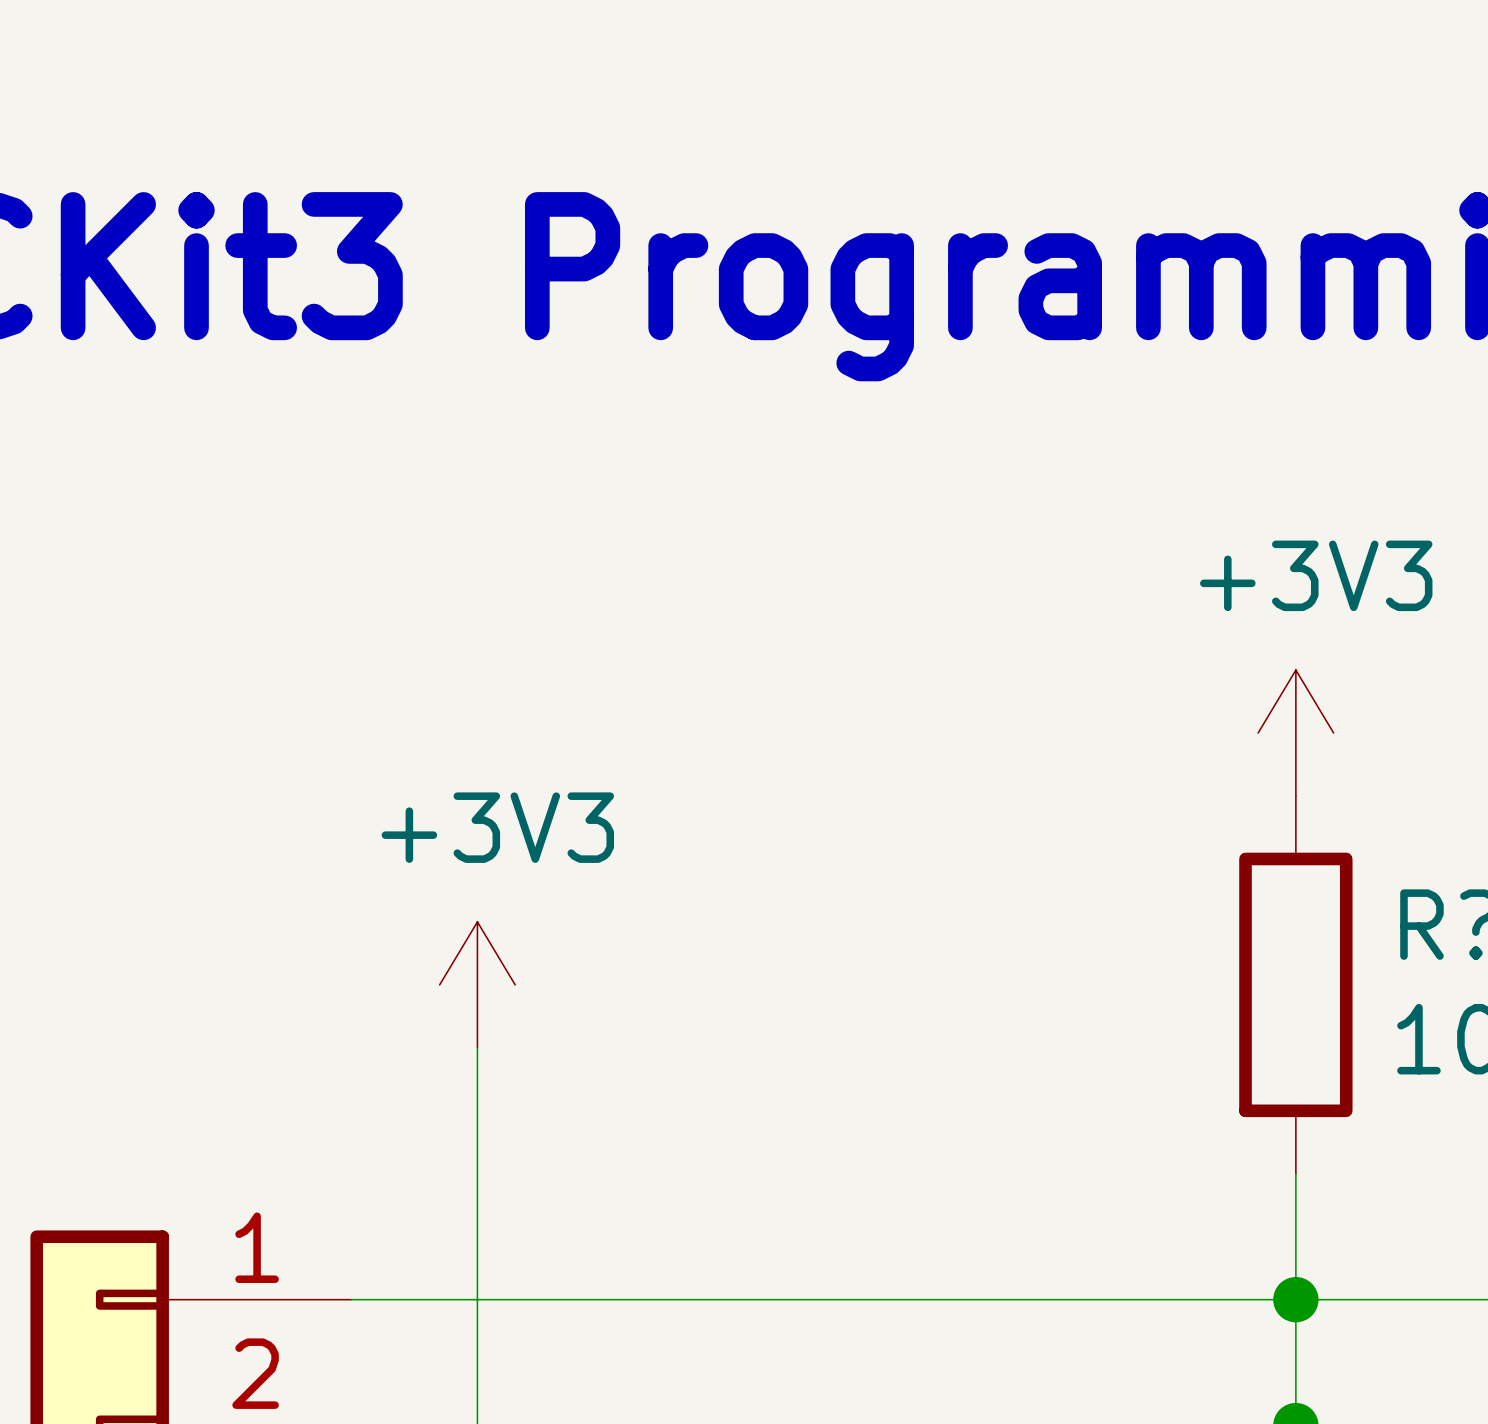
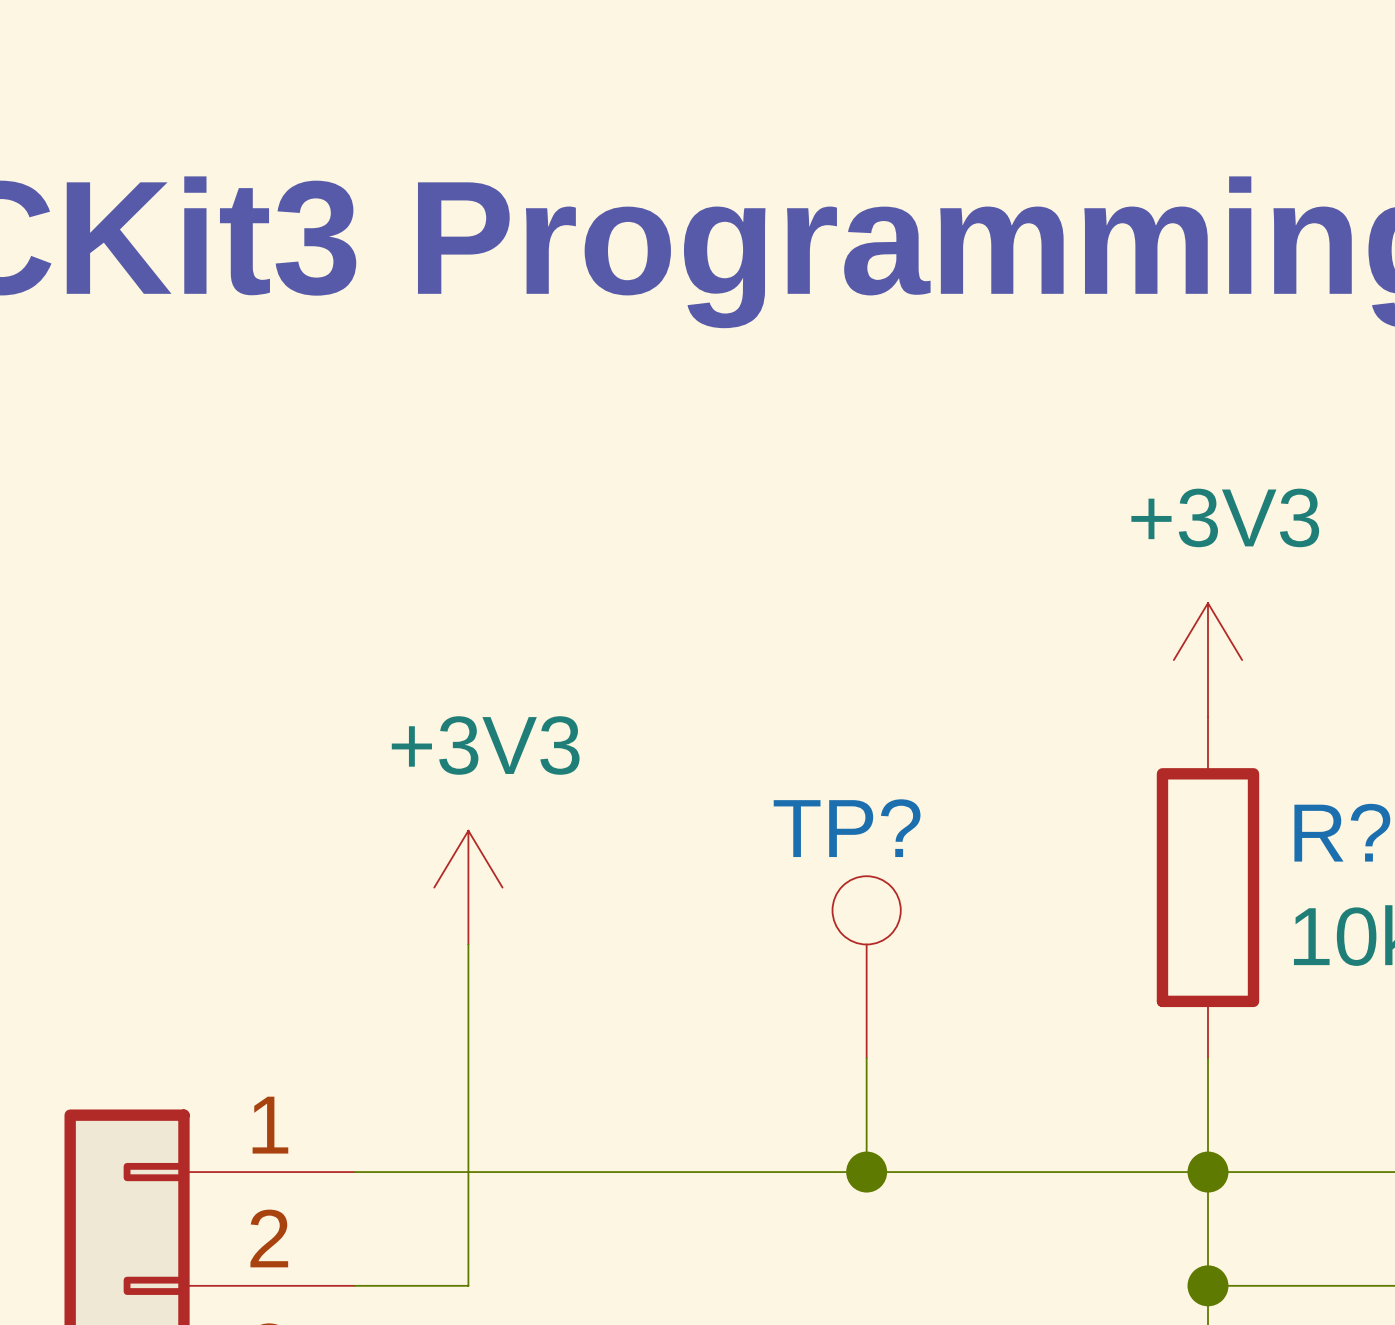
TP?: none -> (866, 967)
wire: none -> (866, 1058) (866, 1172)
junction: none -> (866, 1172)

